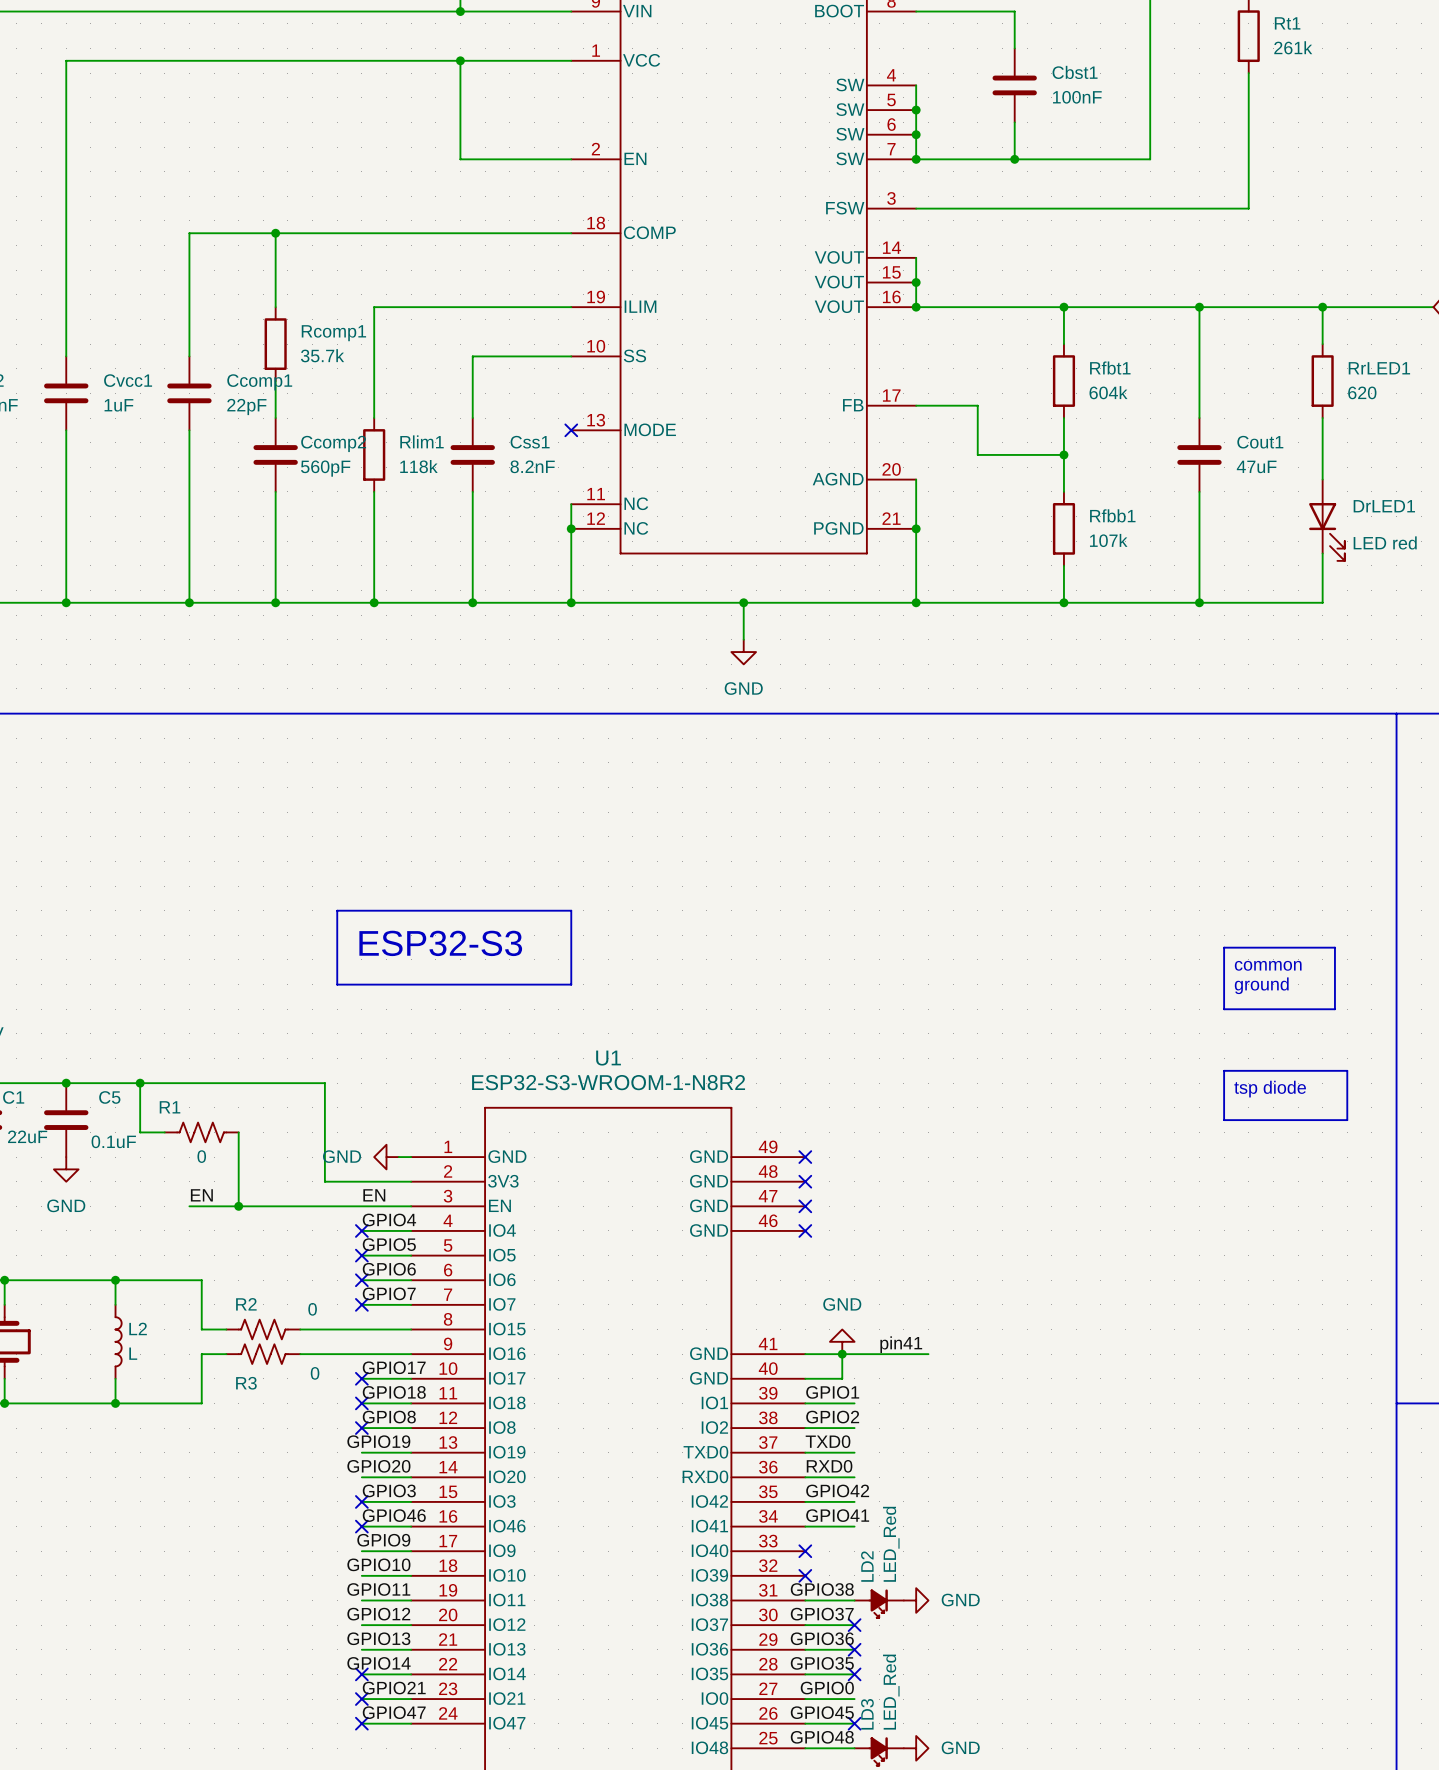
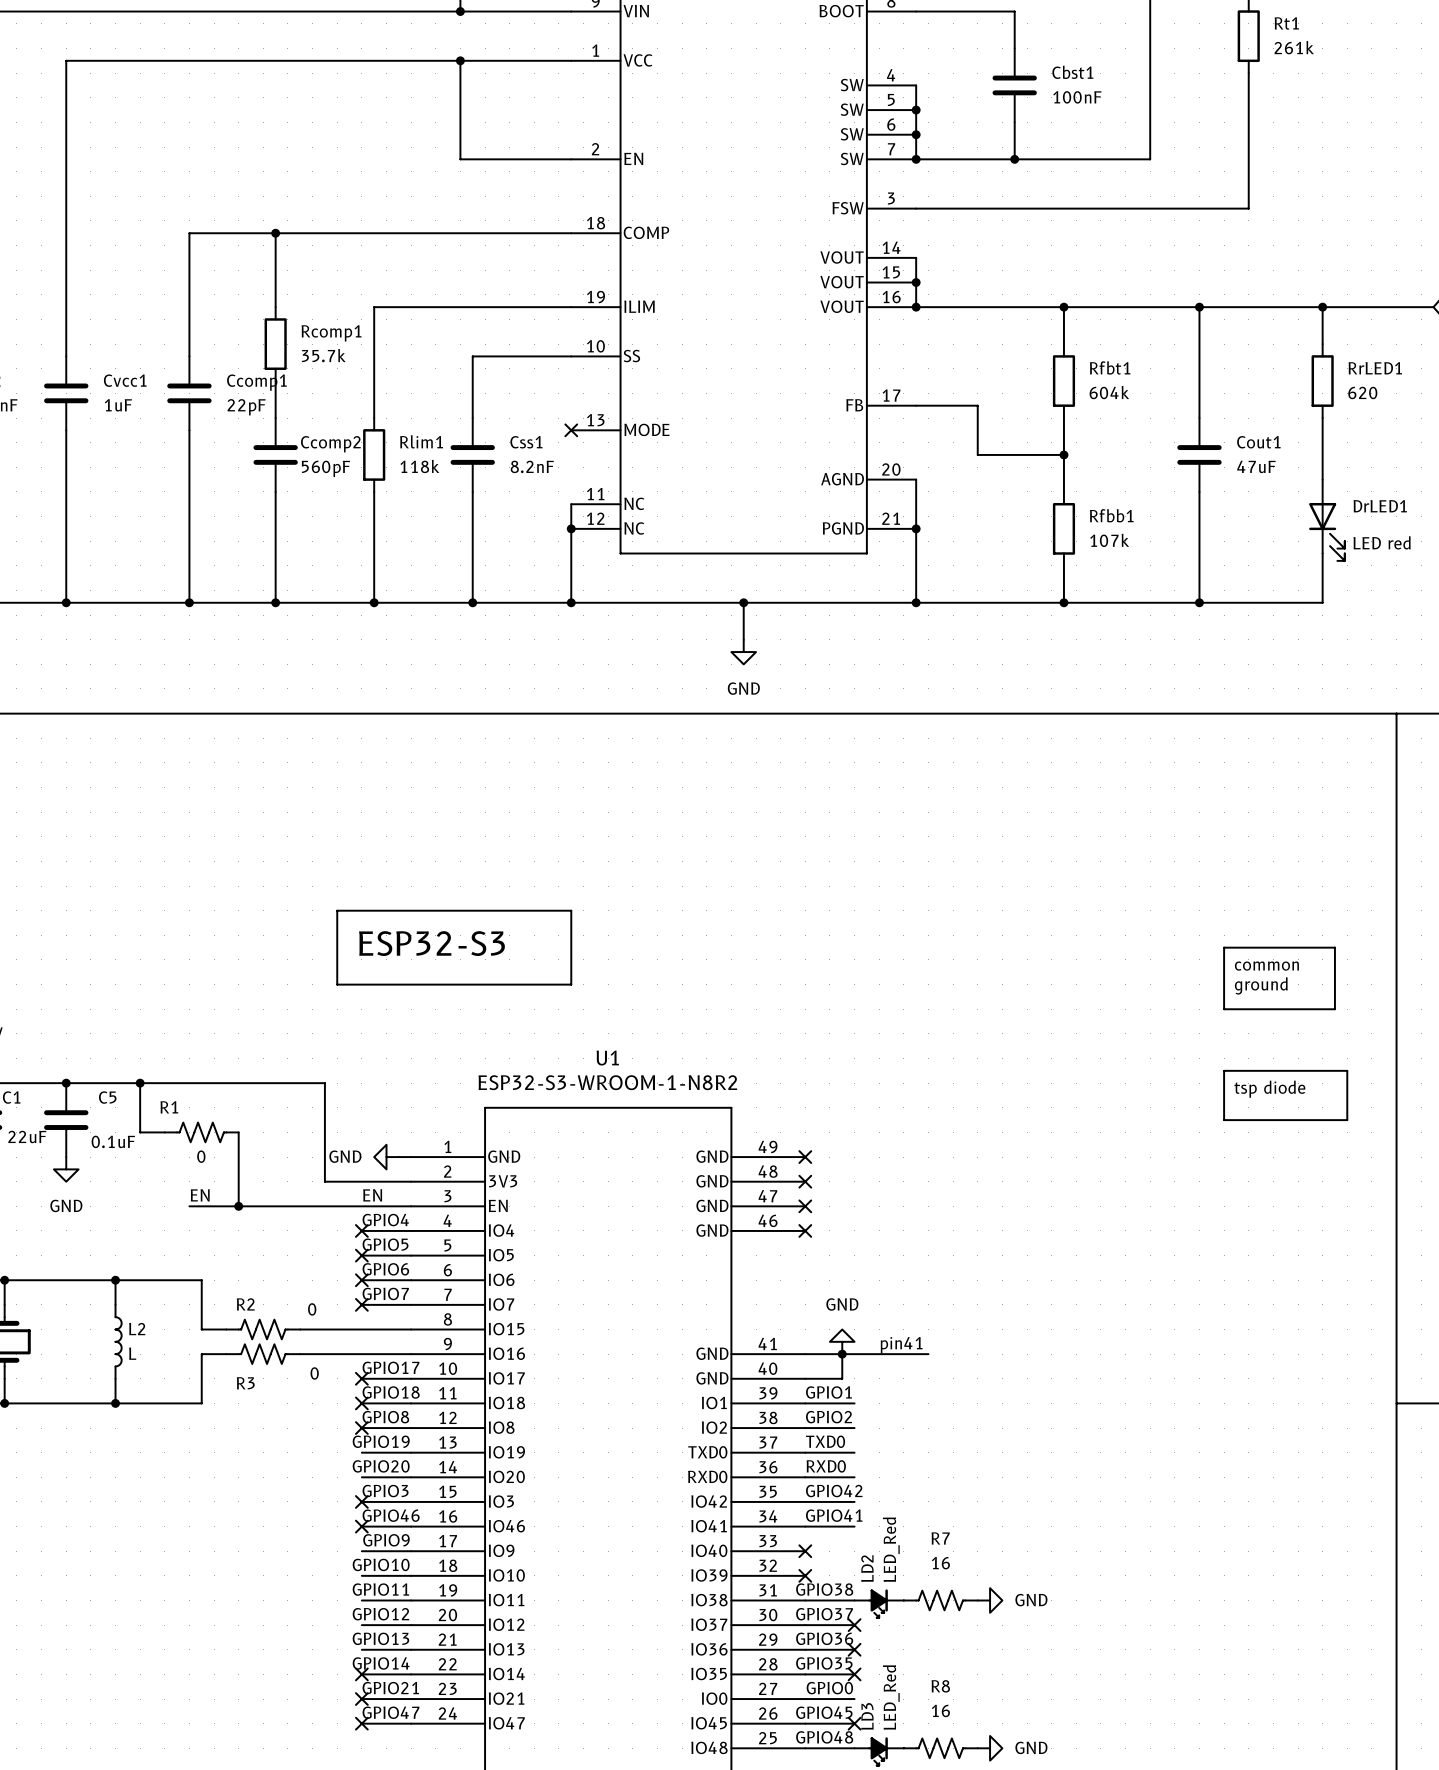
power symbol position: GND (916, 1600) -> GND (990, 1600)
R7: none -> 16 (940, 1600)
power symbol position: GND (916, 1748) -> GND (990, 1748)
R8: none -> 16 (940, 1748)

